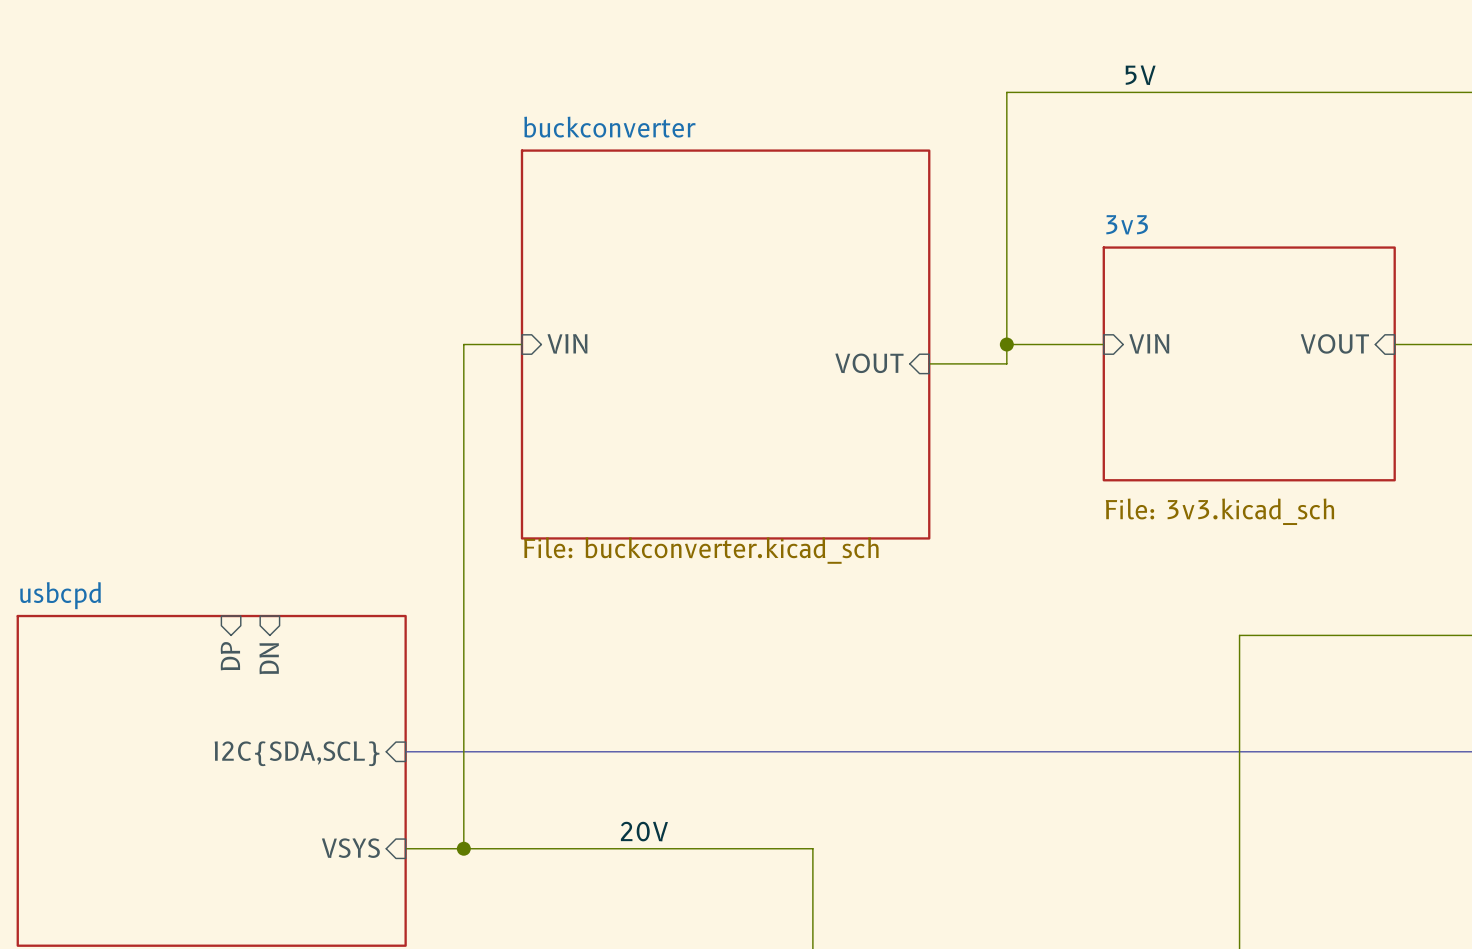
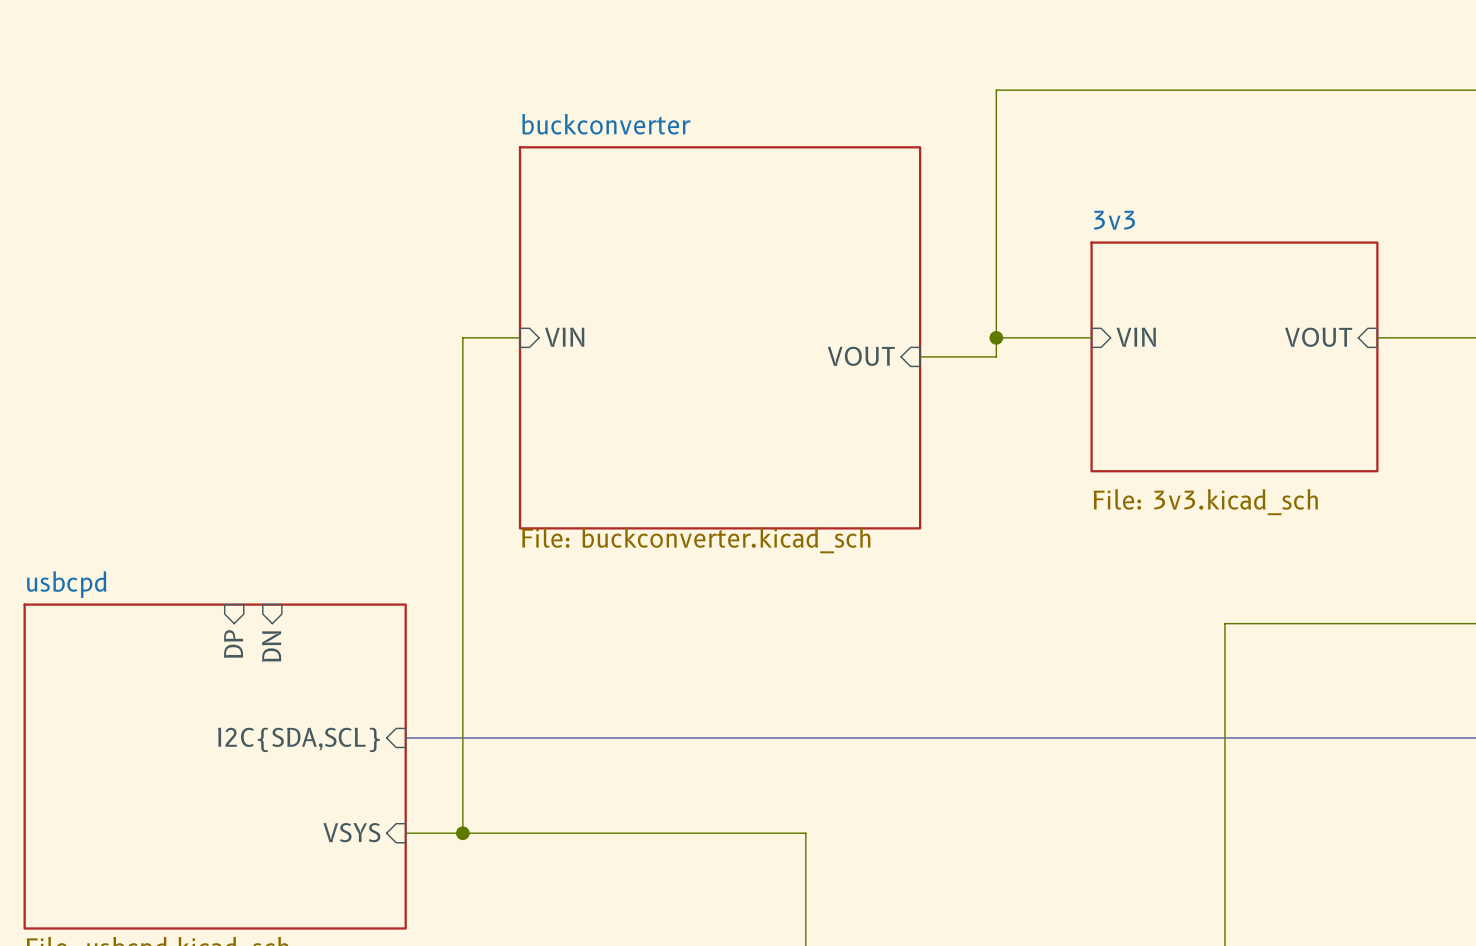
label: 5V (1140, 75) -> none
label: 20V (644, 831) -> none

